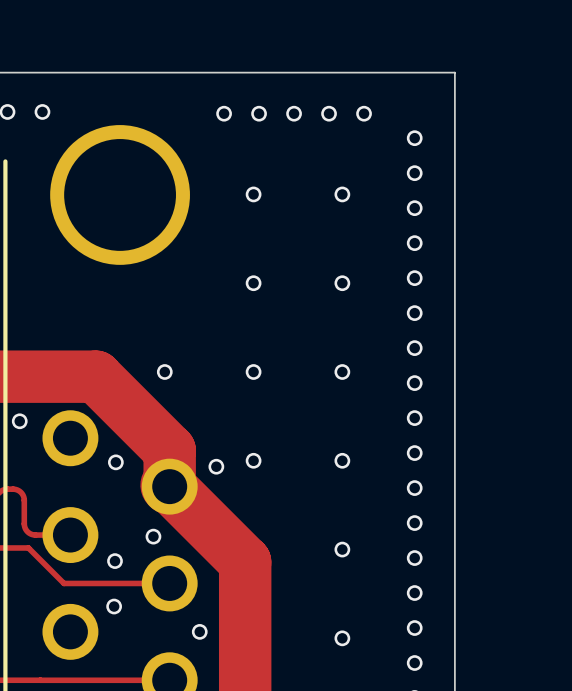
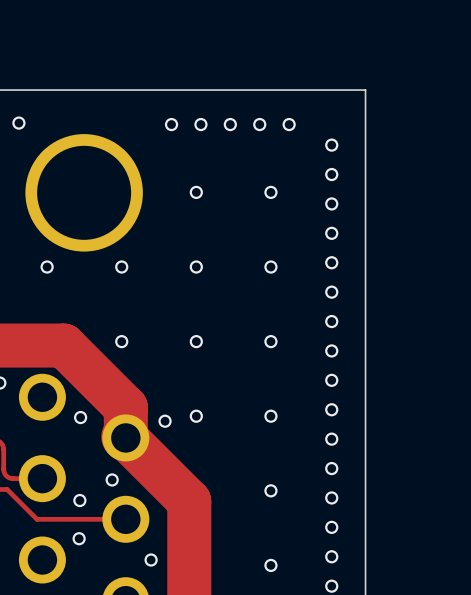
via: none -> (47, 267)
via: none -> (121, 267)

